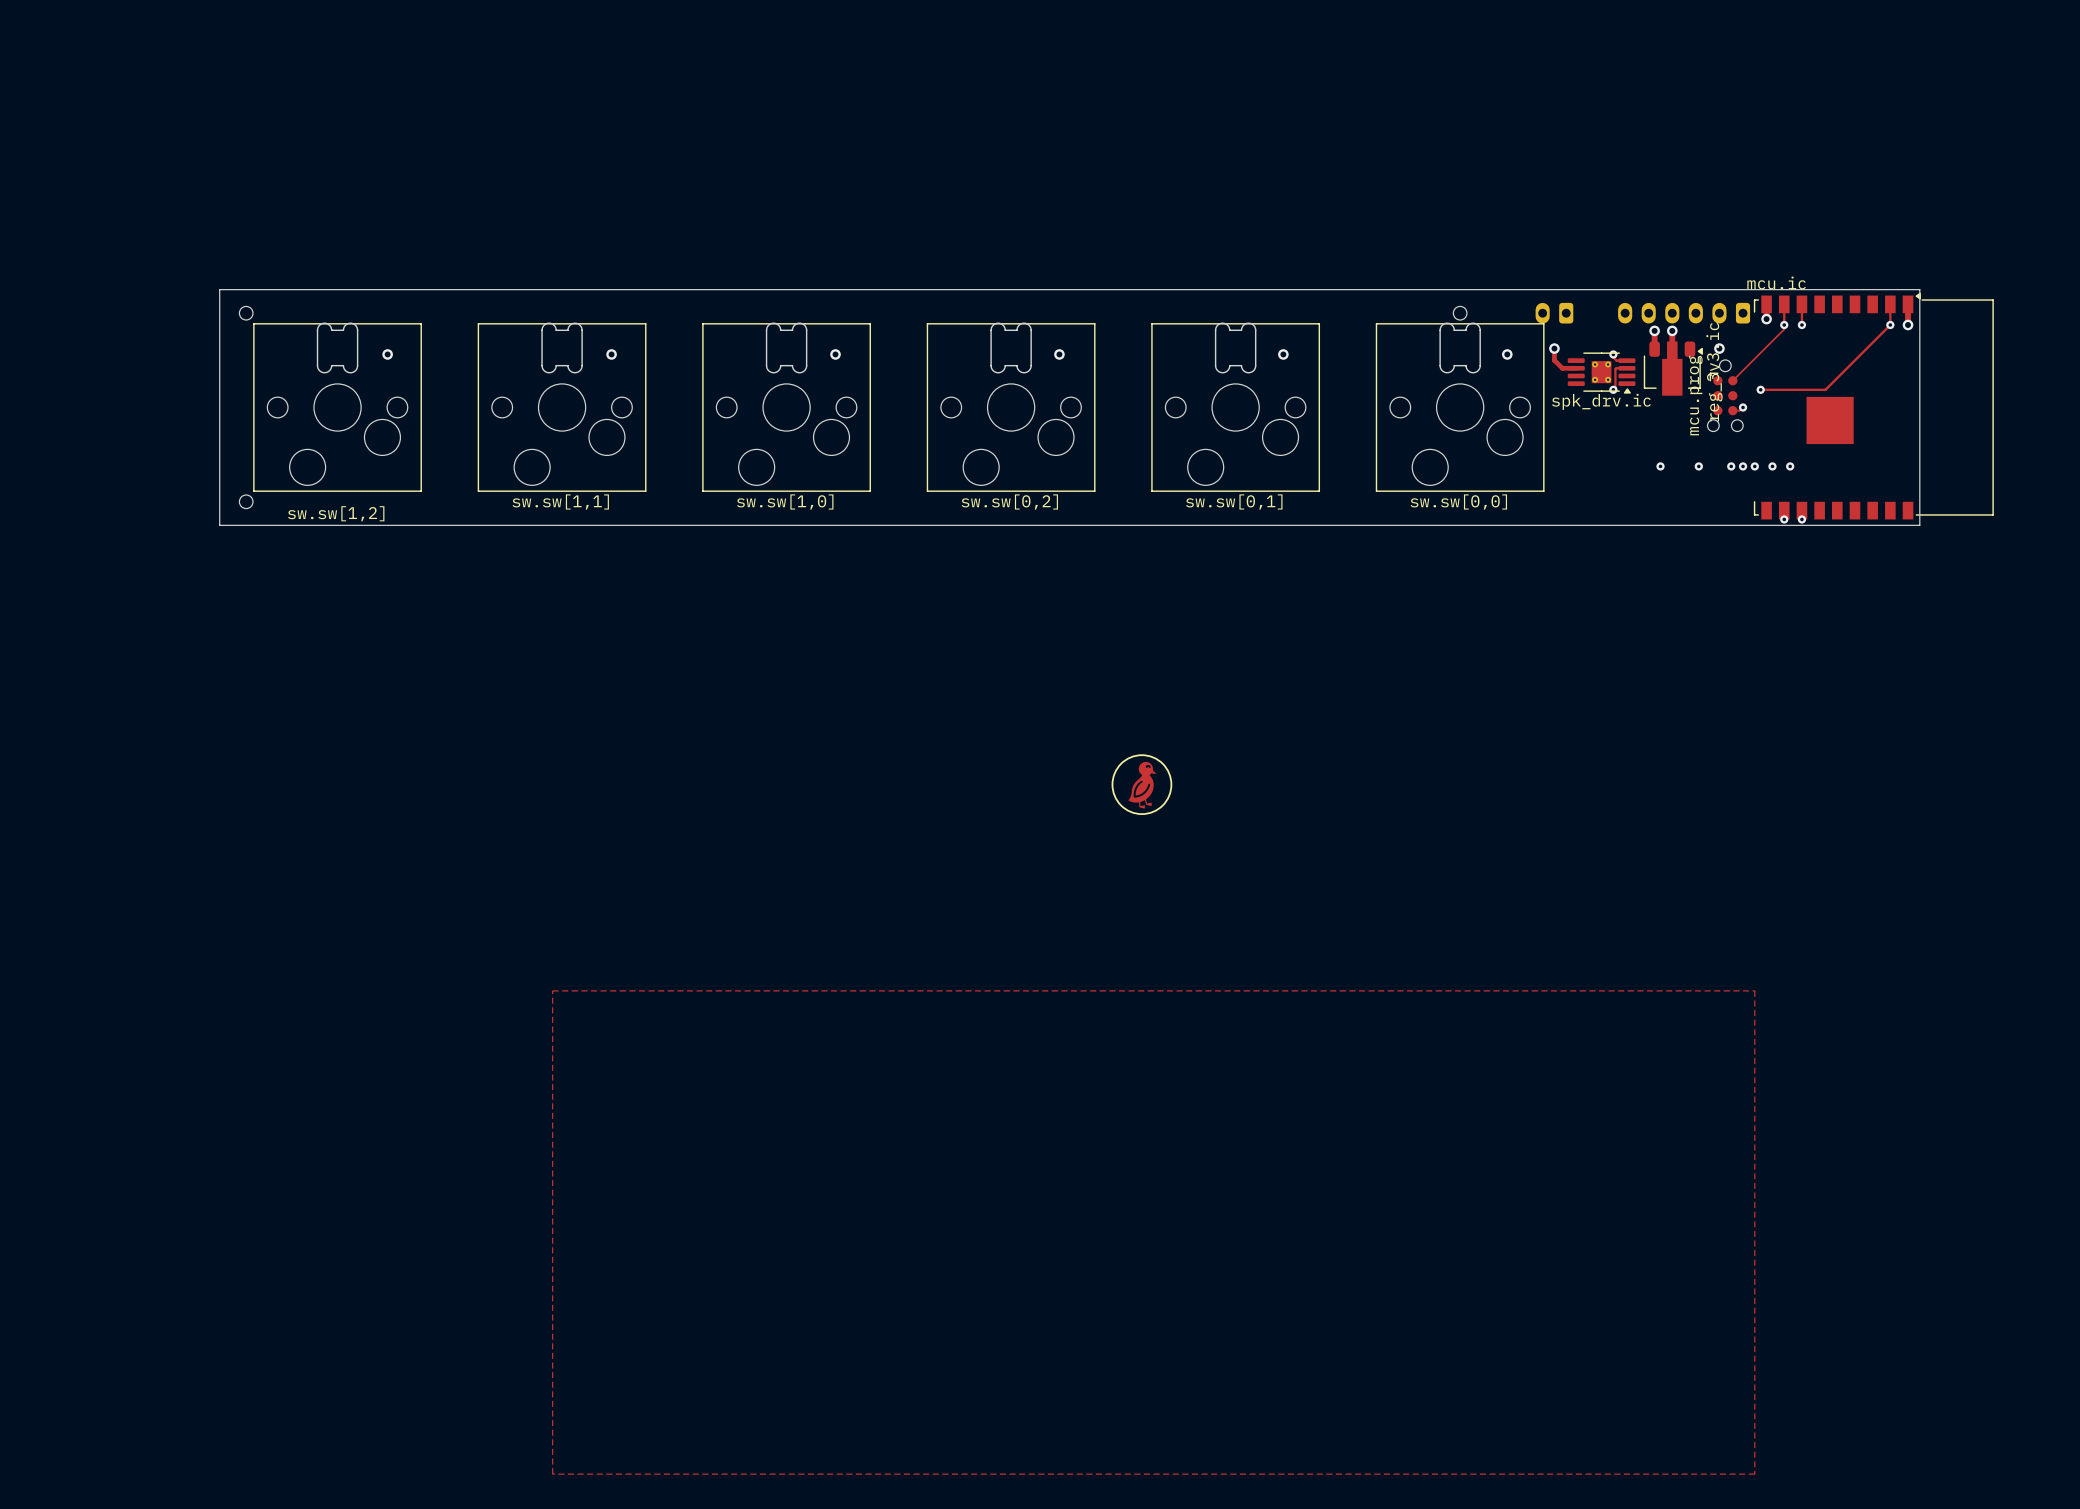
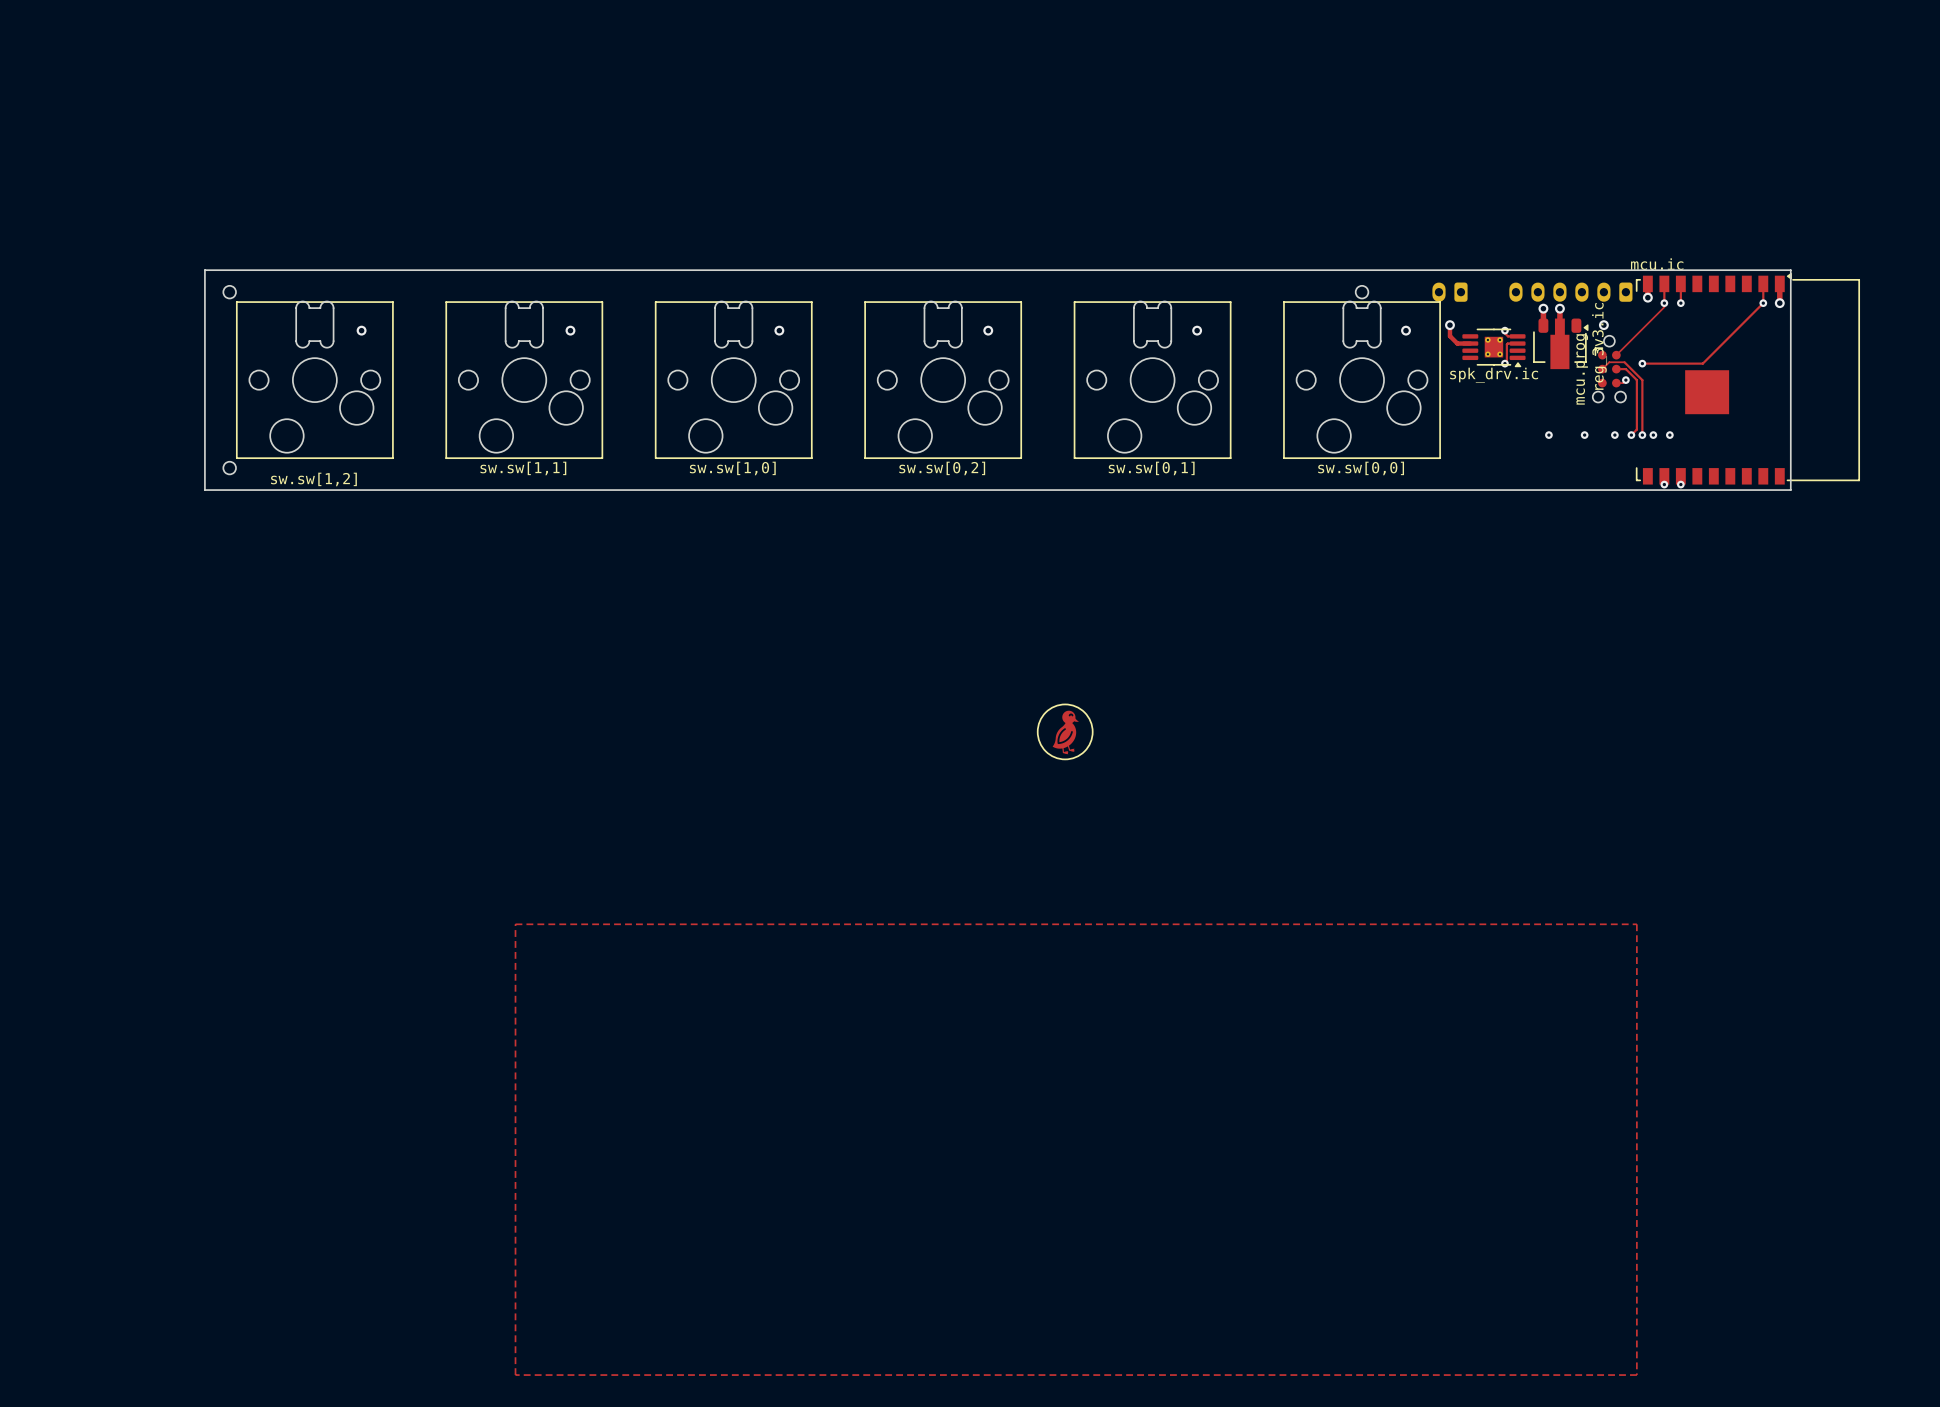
track: none -> (1602, 369) (1609, 362) (1624, 362) (1642, 380) (1642, 435)
track: none -> (1616, 369) (1625, 369) (1636, 380) (1636, 429) (1631, 435)
via: (1743, 466) -> none
via: none -> (1631, 435)
via: (1754, 466) -> none
via: none -> (1642, 435)

